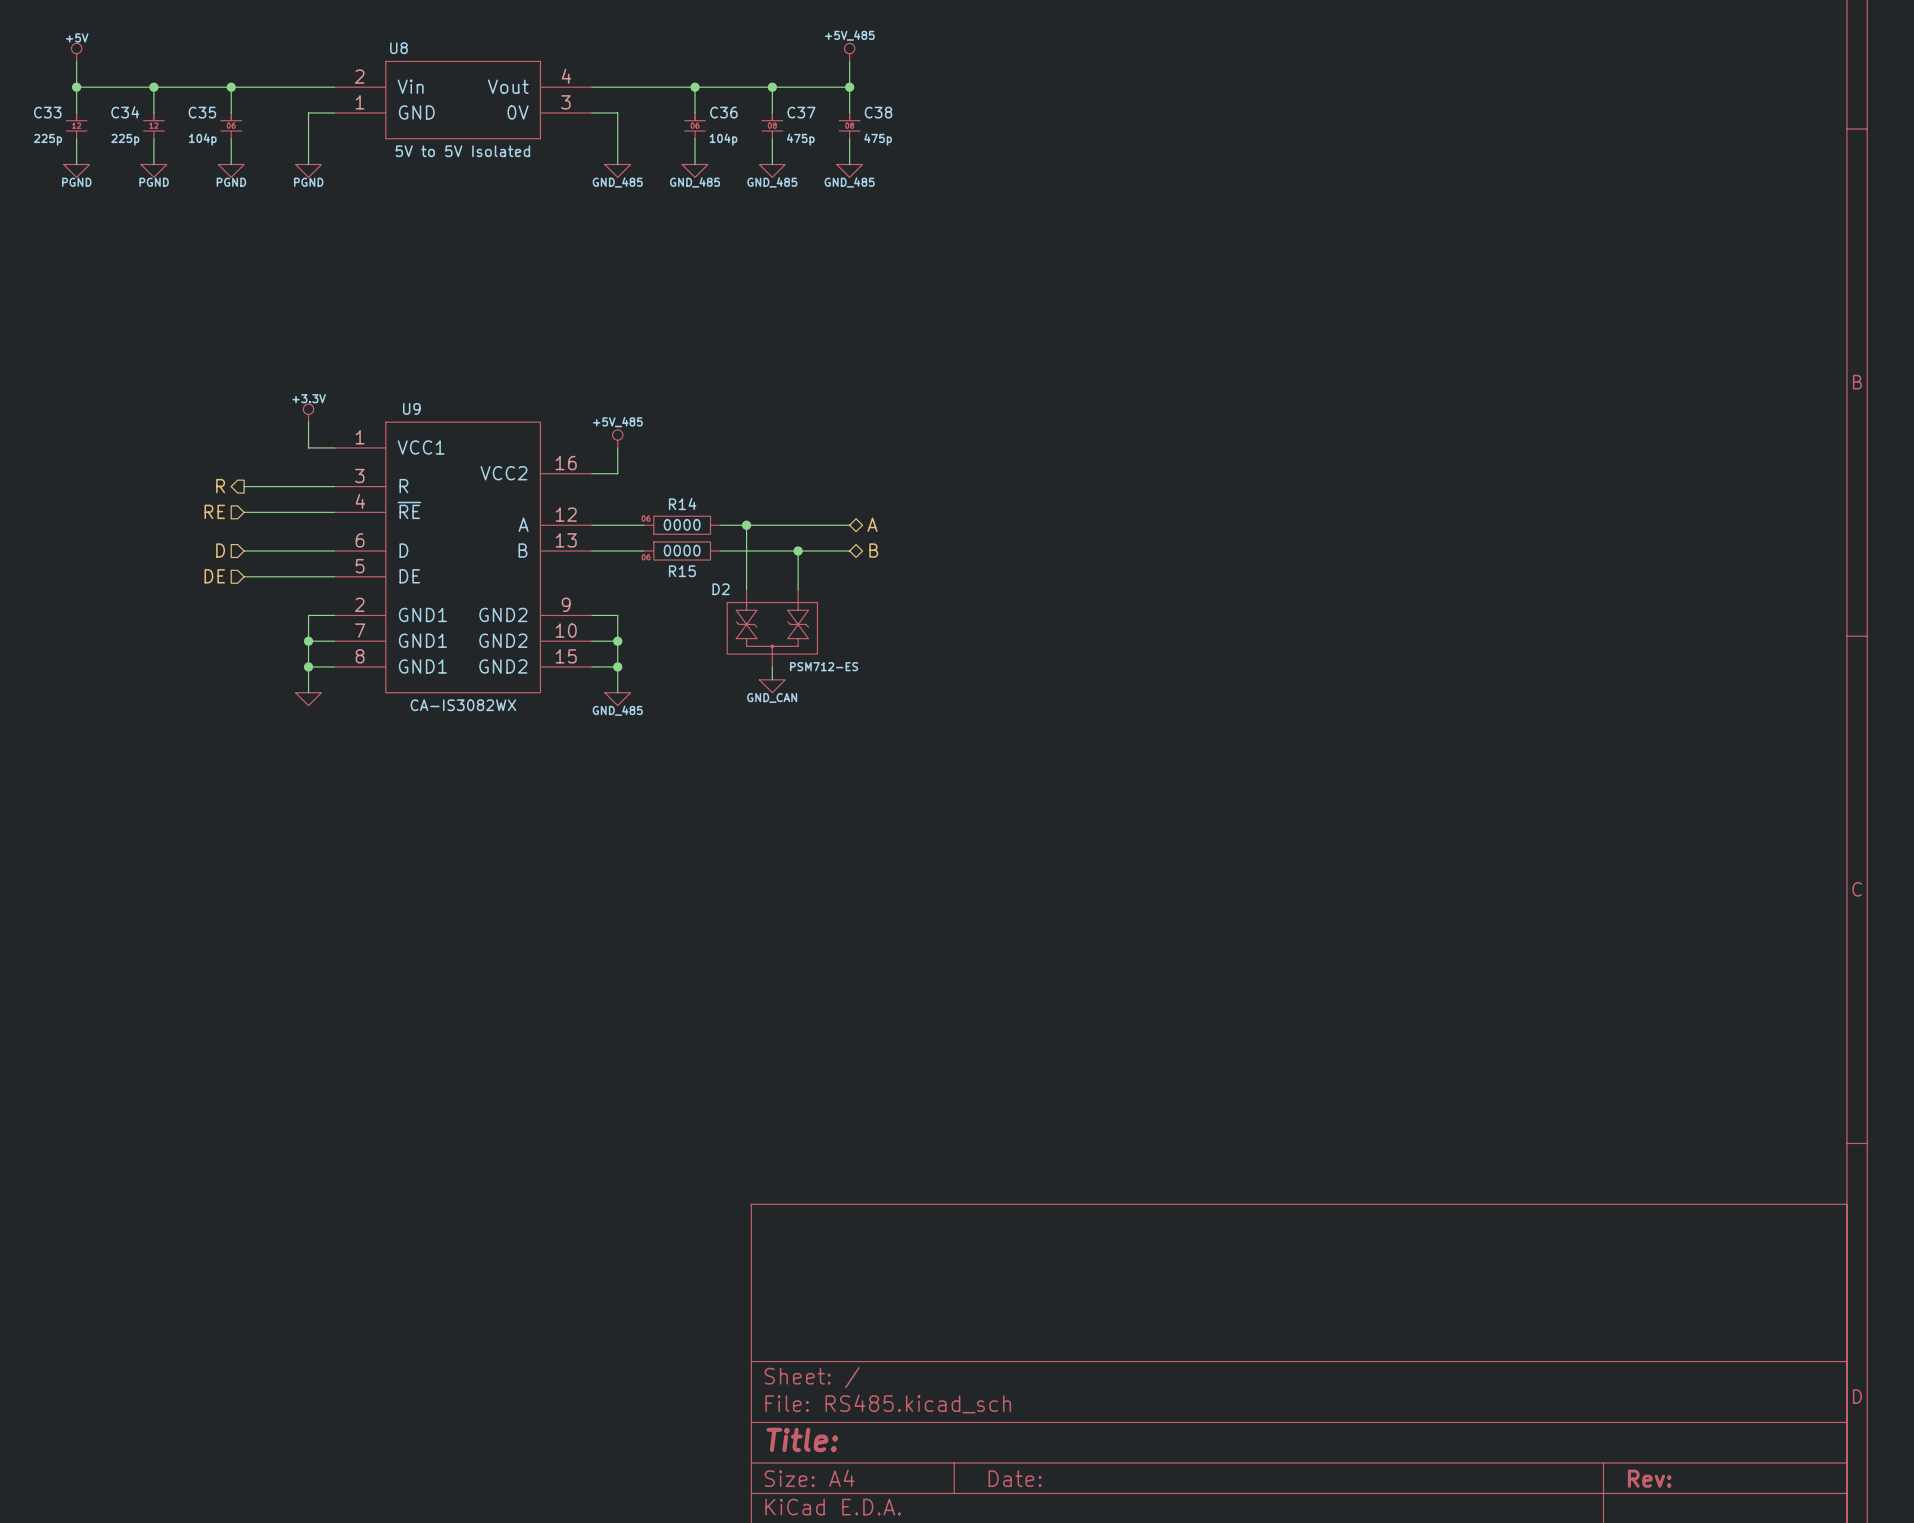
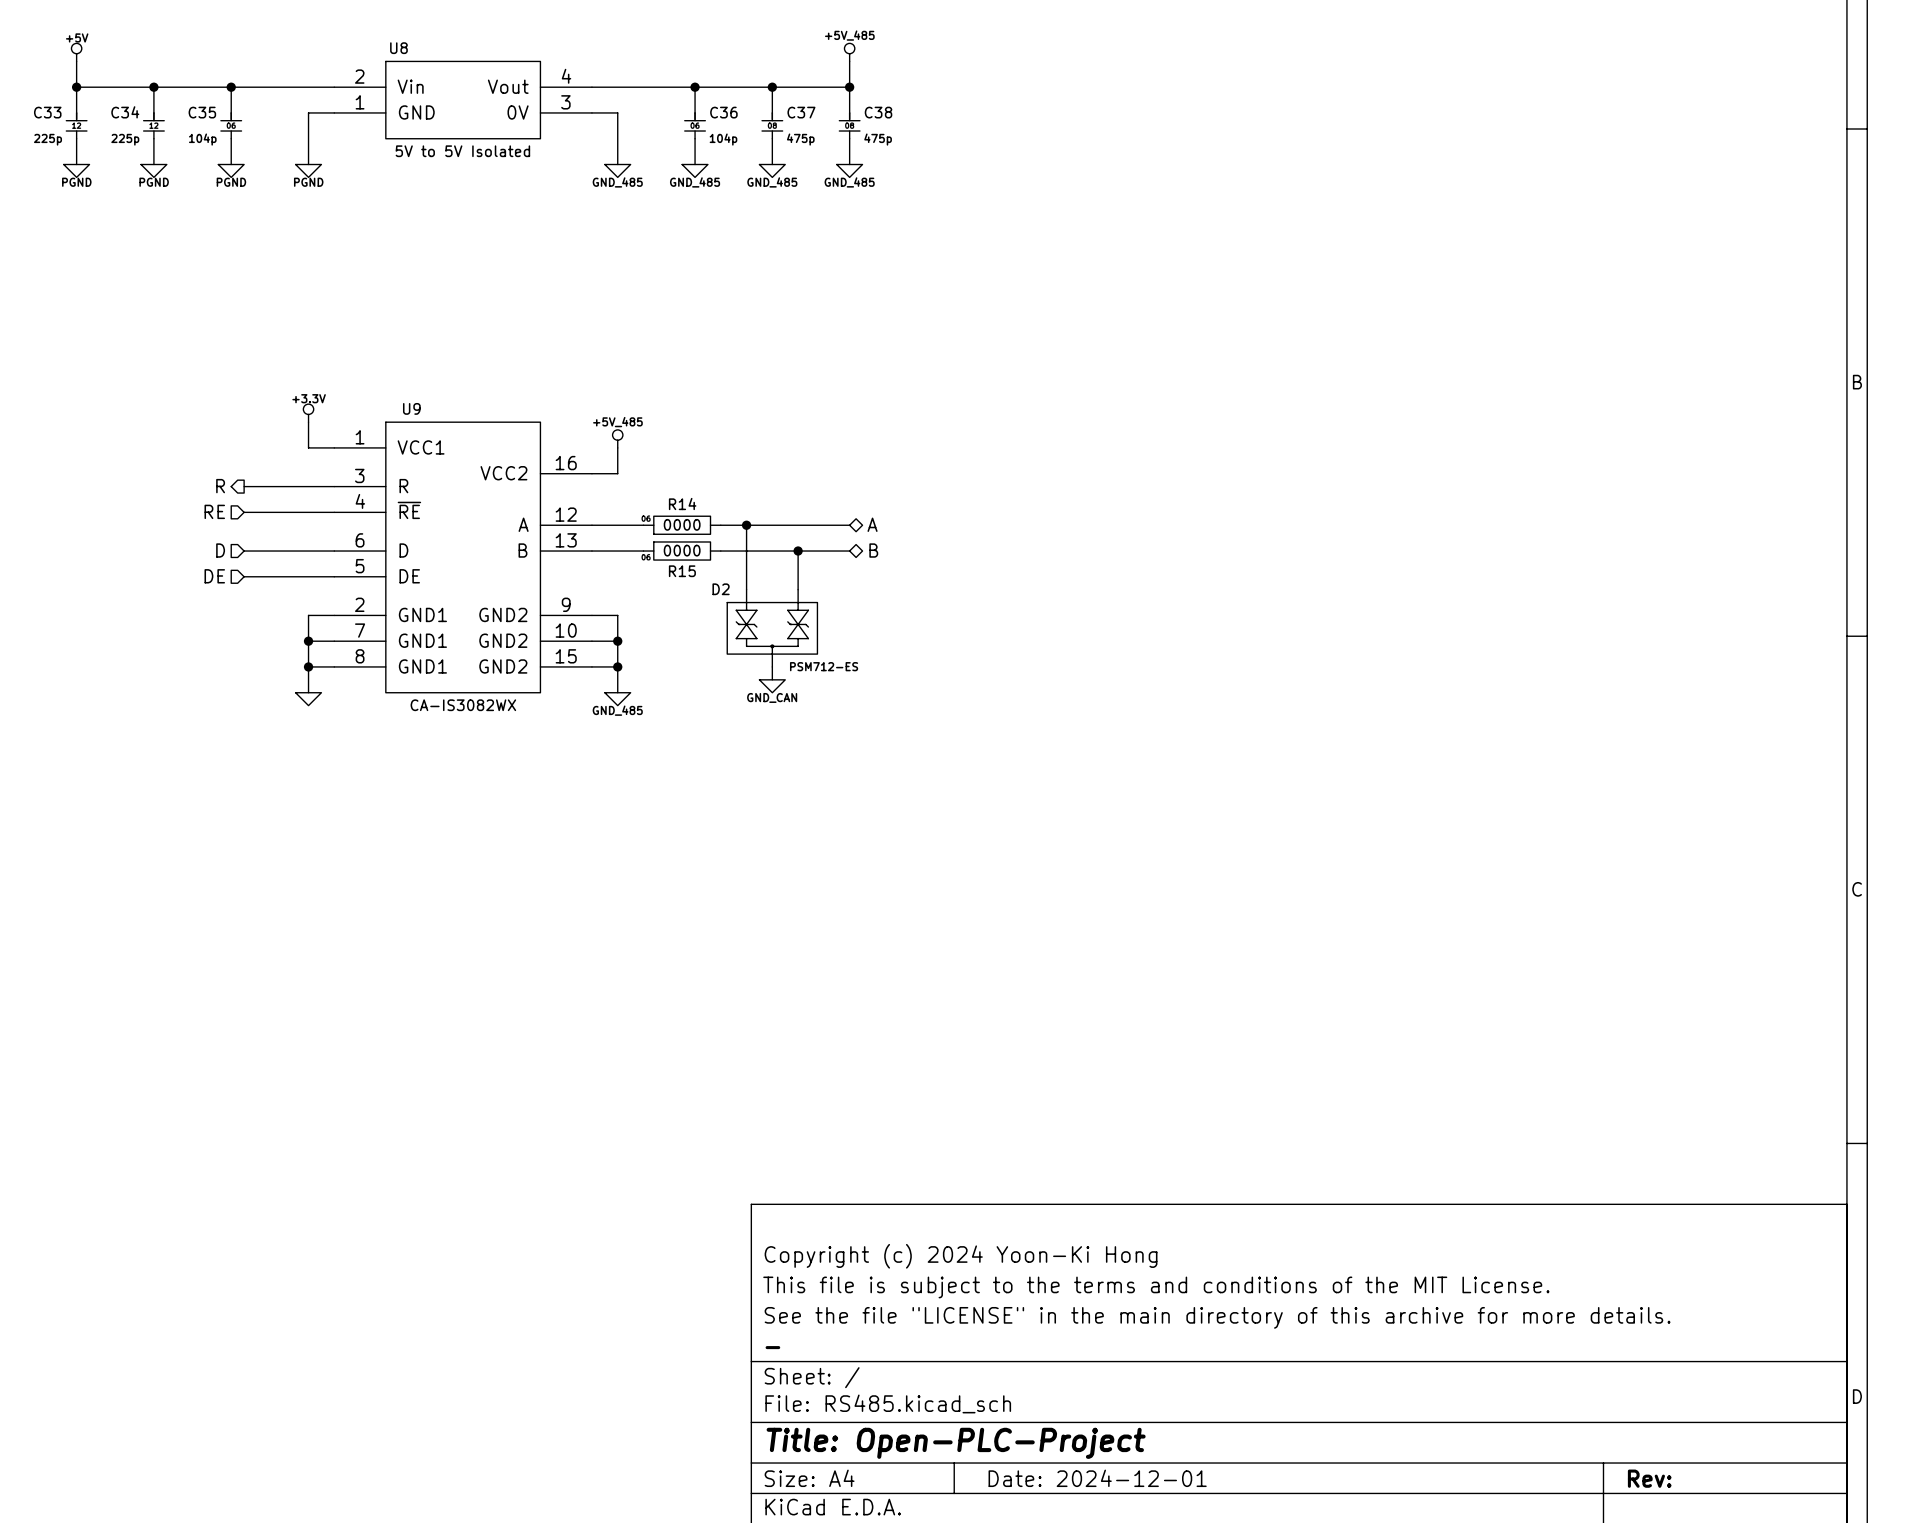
title block: none -> Copyright (c) 2024 Yoon-Ki Hong (961, 1256)
title block: none -> This file is subject to the terms and conditions of the MIT License. (1156, 1287)
title block: none -> See the file "LICENSE" in the main directory of this archive for more details. (1217, 1317)
title block: none -> - (772, 1347)
title block: Title: (802, 1439) -> Title: Open-PLC-Project (956, 1443)
title block: Date: (1015, 1478) -> Date: 2024-12-01 (1097, 1478)

